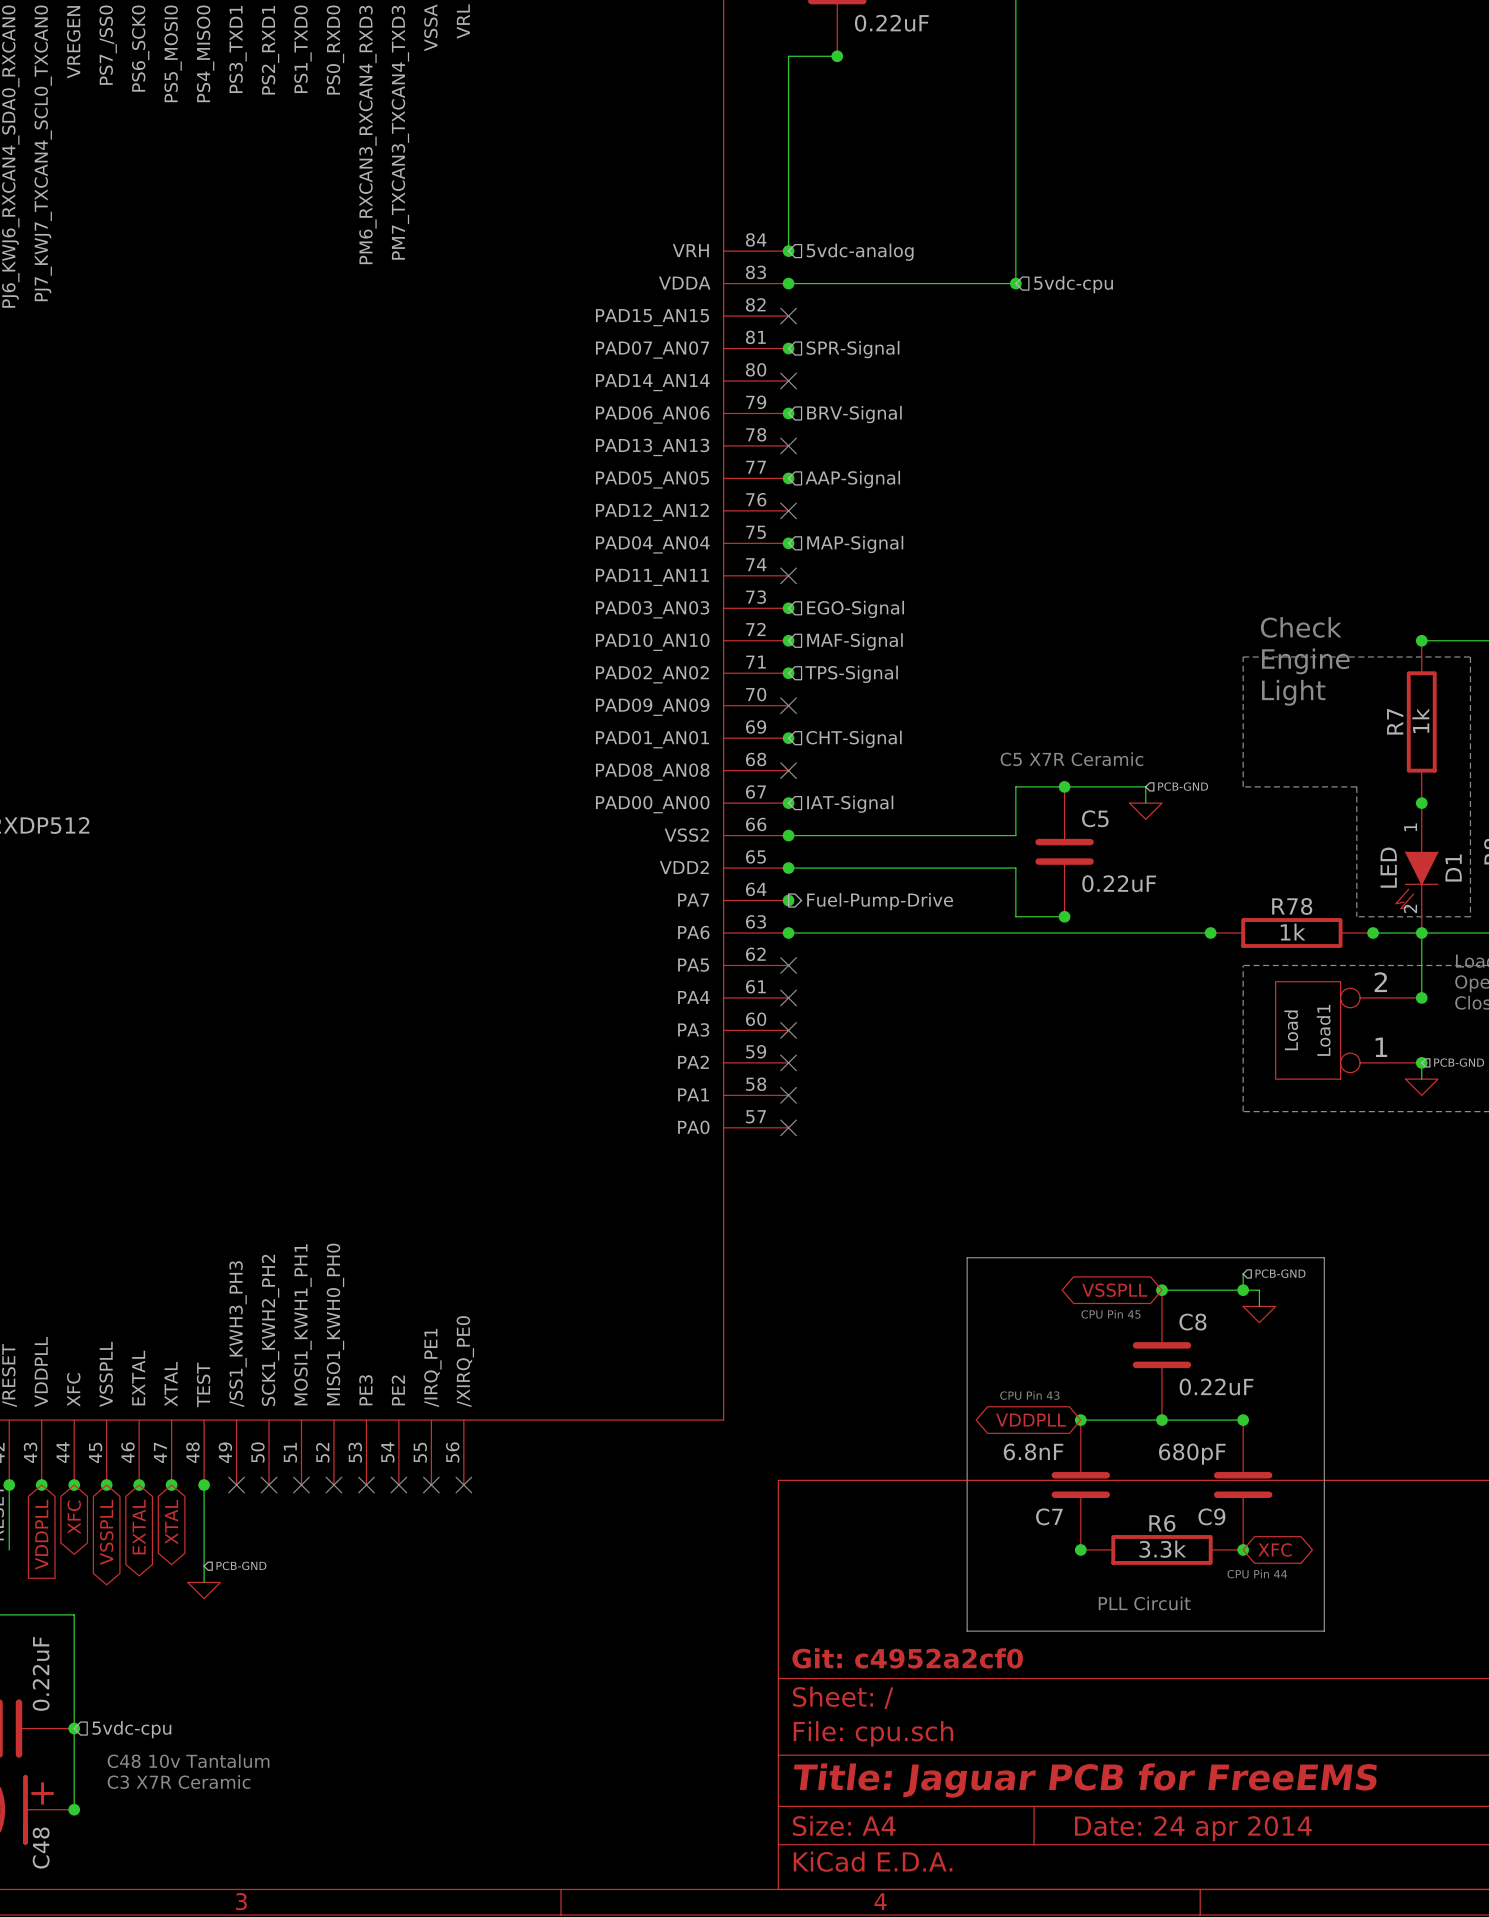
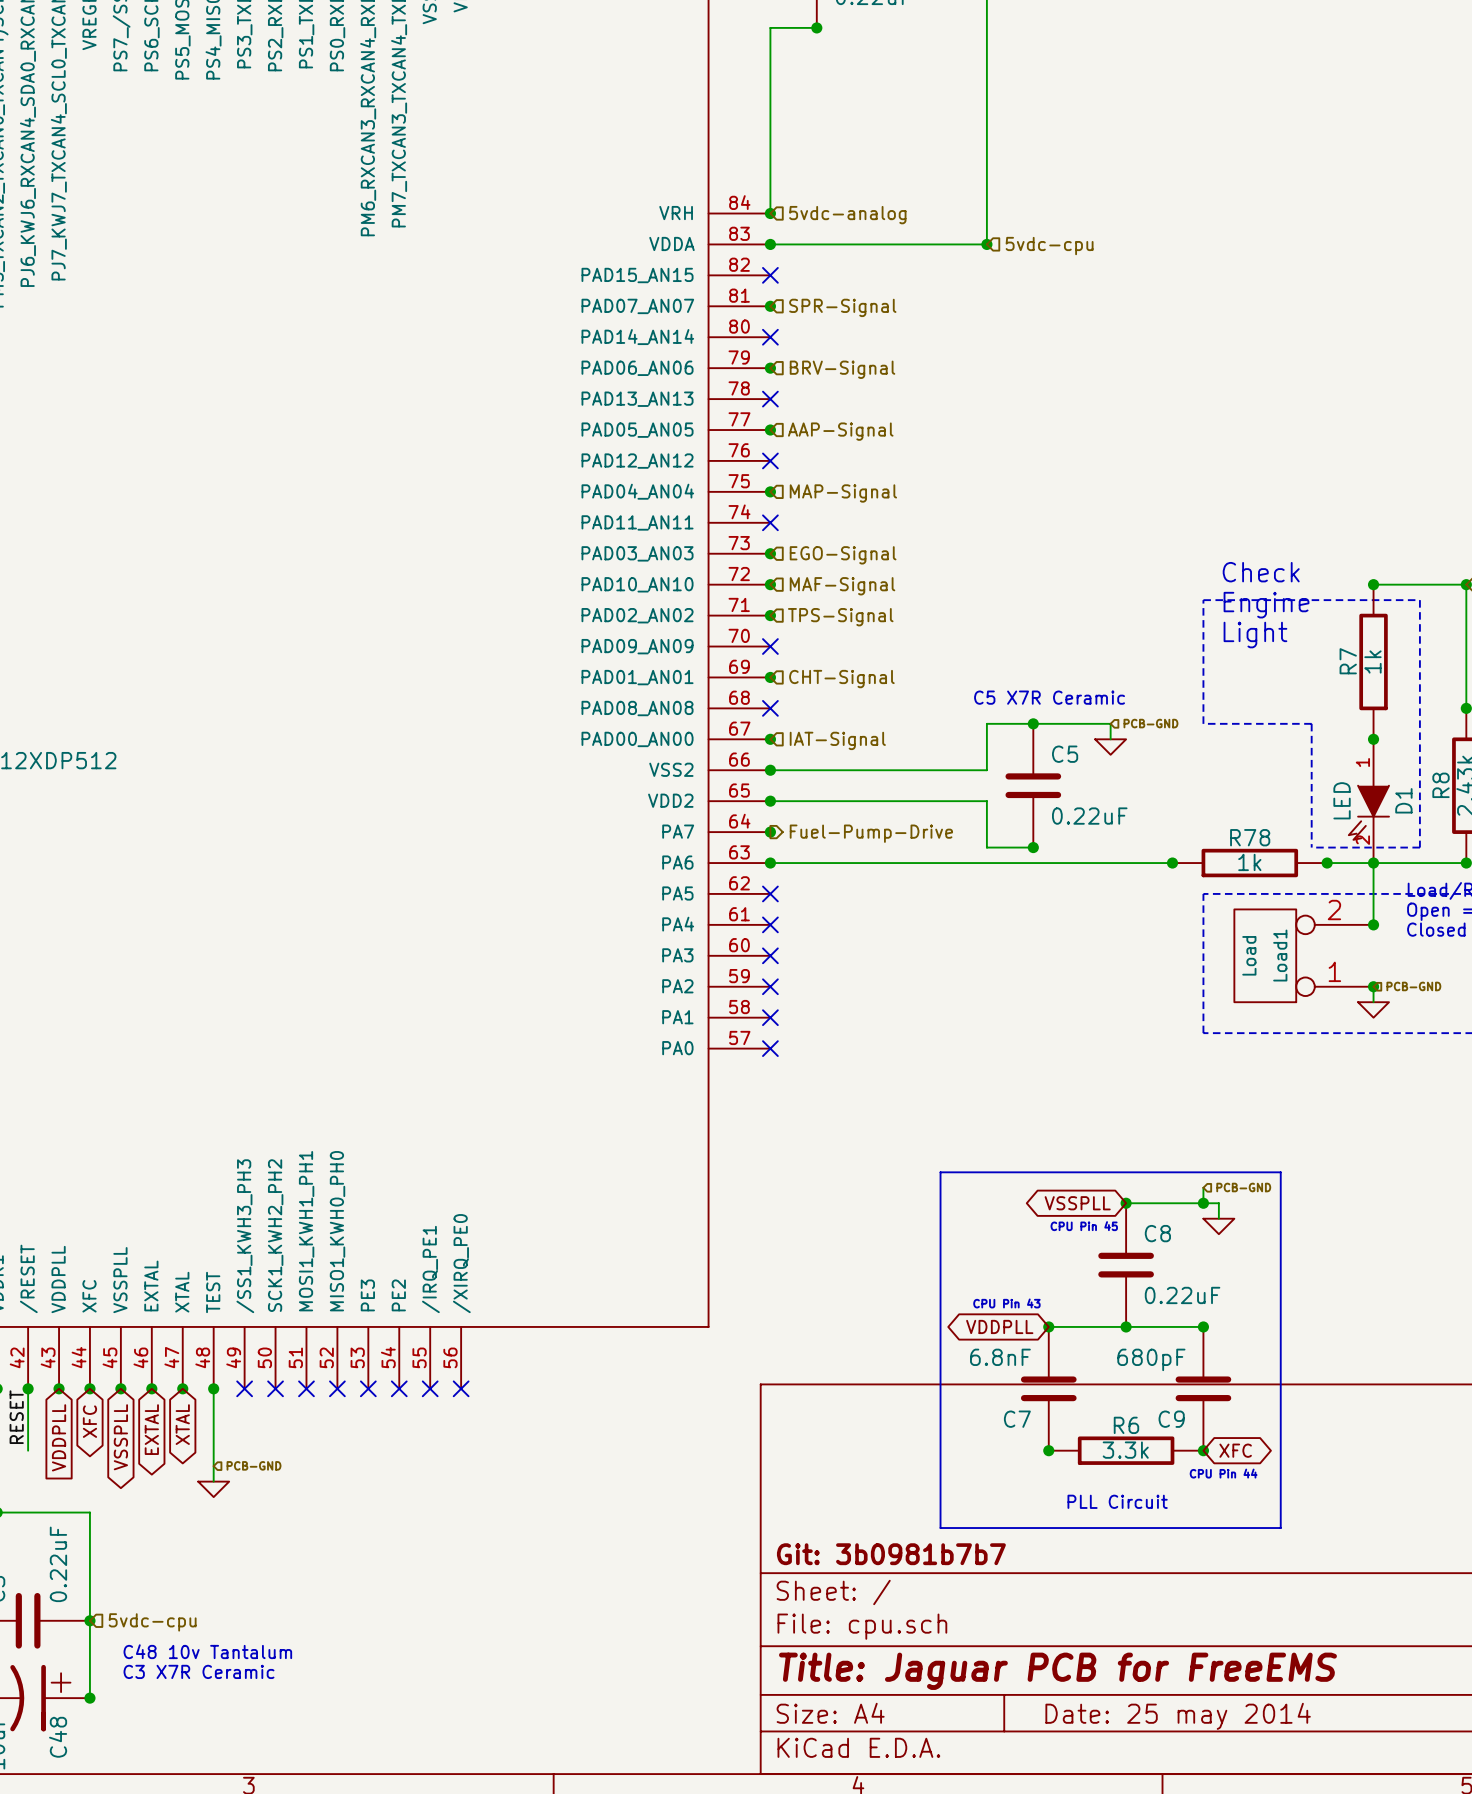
title block: Git: c4952a2cf0 (907, 1658) -> Git: 3b0981b7b7 (891, 1554)
title block: Date: 24 apr 2014 (1193, 1828) -> Date: 25 may 2014 (1178, 1716)

